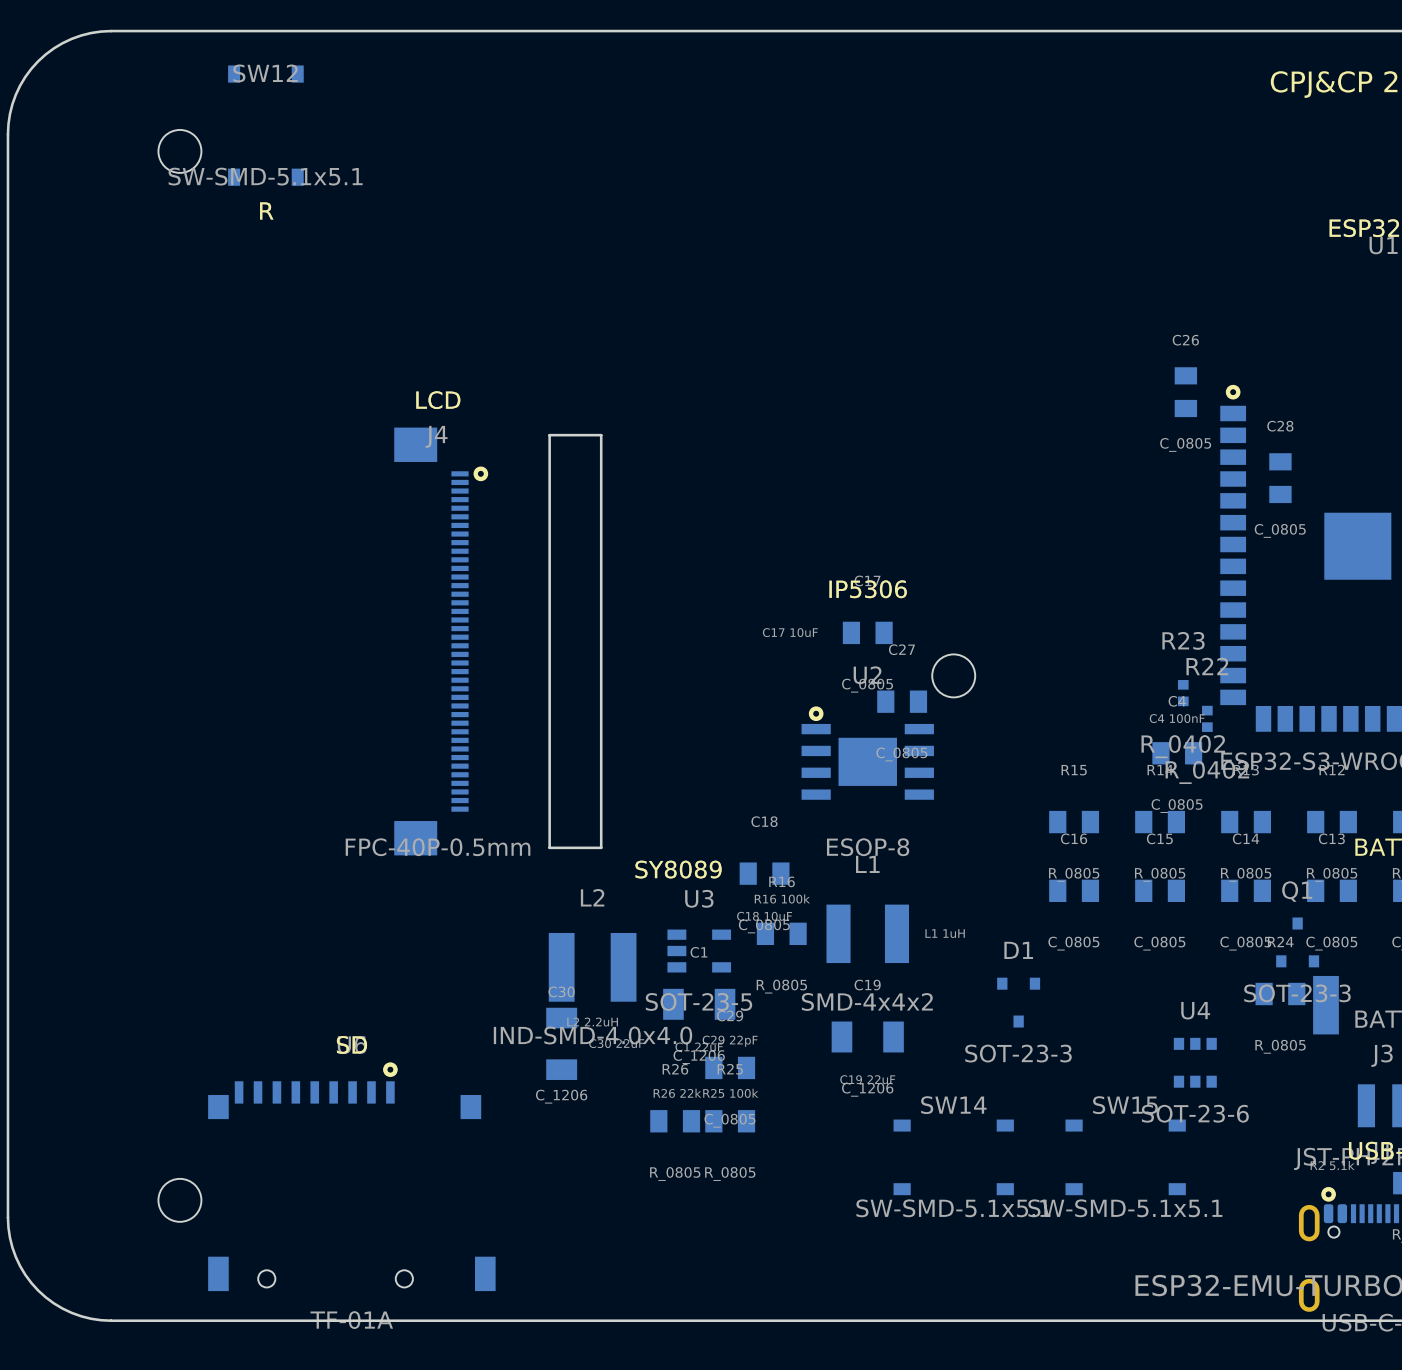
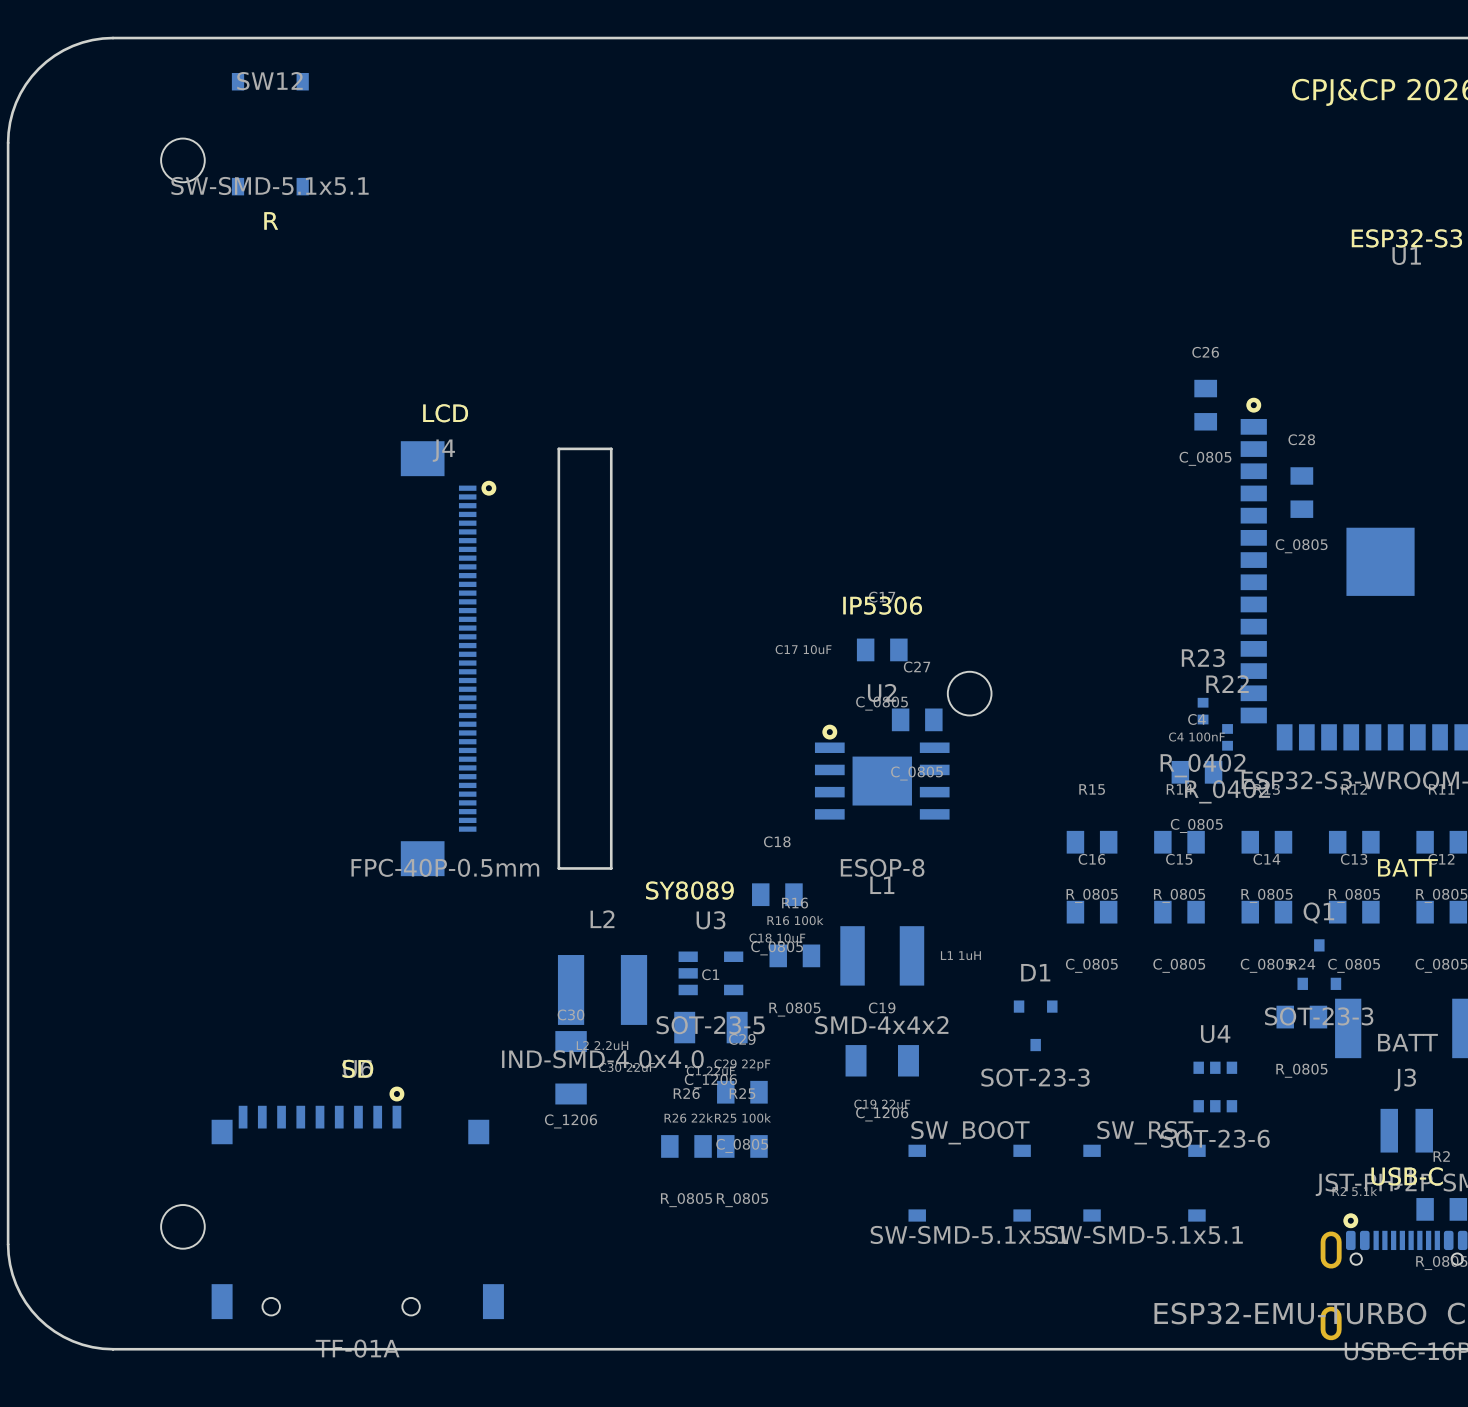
SW14 name: SW14 (953, 1105) -> SW_BOOT (970, 1132)
SW15 name: SW15 (1125, 1105) -> SW_RST (1145, 1132)

